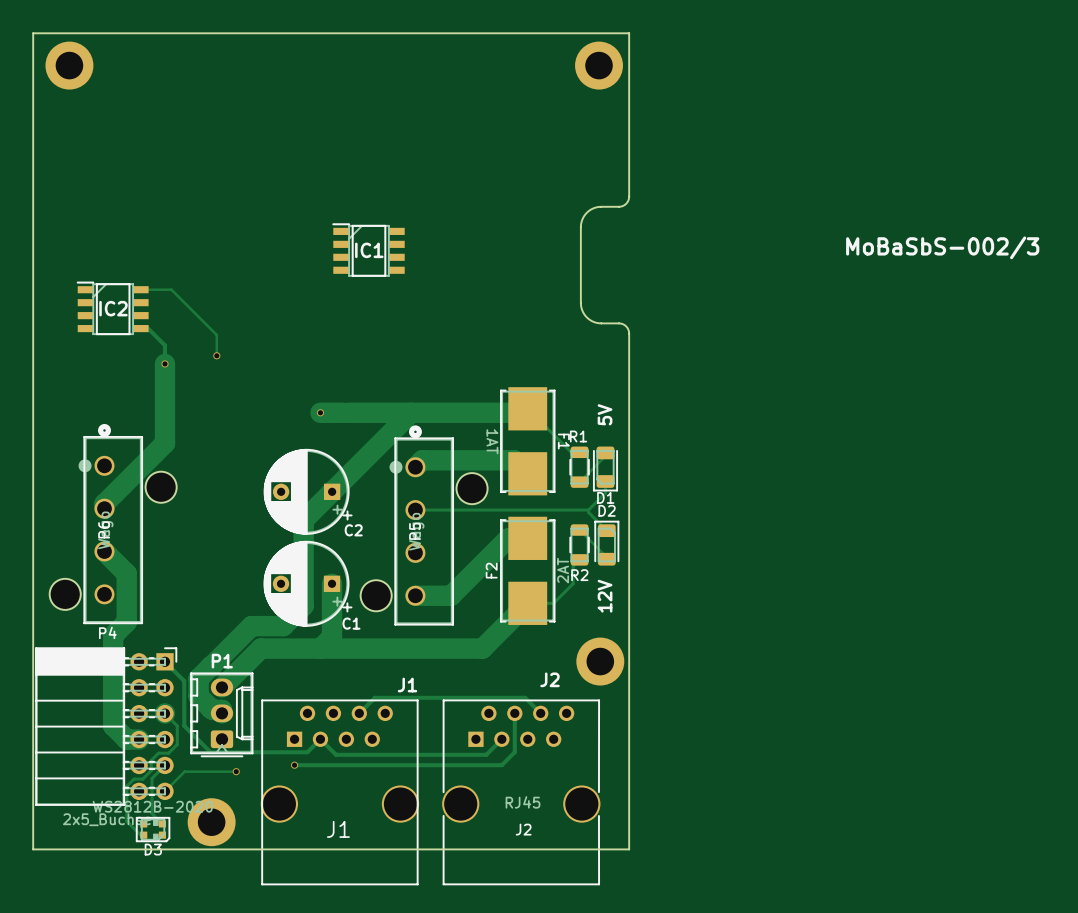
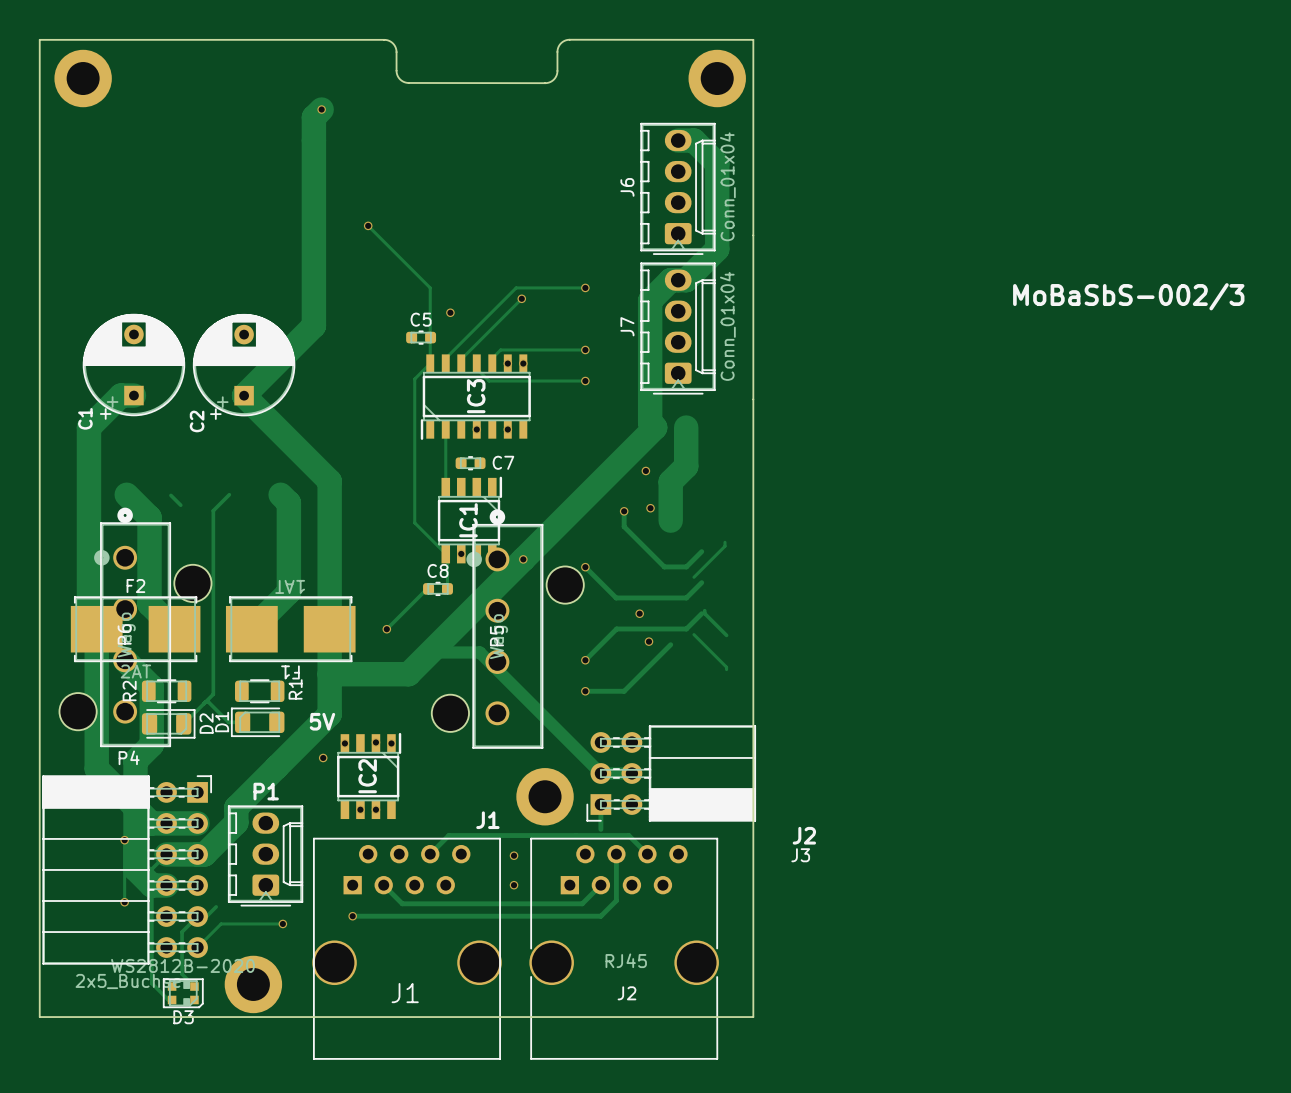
board edge: (320, 33) (629, 33) -> (384, 39) (390, 41) (395, 46) (397, 74) (401, 80) (406, 82) (545, 83) (551, 81) (556, 76) (558, 47) (561, 43) (566, 40) (753, 39)
via: none -> (321, 109)
track: none -> (678, 140) (693, 140) (717, 163) (717, 249) (686, 280) (670, 280) (650, 300) (650, 422) (655, 427) (408, 674) (329, 674)
J6: none -> Conn_01x04 (677, 188)
track: none -> (368, 225) (430, 287) (430, 363) (414, 379) (414, 522) (447, 555) (447, 588)
via: none -> (368, 225)
board edge: (629, 196) (626, 202) (622, 206) (599, 206) (590, 209) (584, 216) (580, 227) (580, 302) (582, 311) (588, 318) (594, 322) (623, 324) (627, 328) (629, 333) -> (753, 235) (753, 399)
track: none -> (585, 287) (516, 287) (445, 358) (445, 363)
via: none -> (585, 287)
track: none -> (521, 298) (461, 359) (461, 363)
via: none -> (521, 298)
IC1 rotation: 0° (368, 250) -> 90° clockwise (469, 520)
IC1 position: (368, 250) -> (469, 520)
via: none -> (450, 312)
J7: none -> Conn_01x04 (677, 328)
C5: none -> (421, 337)
track: (140, 289) (171, 289) (216, 335) (216, 355) -> none
track: none -> (585, 349) (500, 349) (492, 358) (492, 363)
via: none -> (585, 349)
track: none -> (476, 363) (476, 368) (489, 381) (585, 381)
via: none -> (507, 363)
via: none -> (523, 363)
IC2 rotation: 0° (112, 308) -> 90° clockwise (369, 775)
IC2 position: (112, 308) -> (369, 775)
via: none -> (585, 381)
track: (140, 328) (148, 328) (164, 345) (164, 443) (104, 503) (104, 508) -> none
track: none -> (133, 395) (120, 395) (88, 427) (88, 621) (96, 629) (96, 768) (151, 823) (197, 823)
IC3: none -> (475, 397)
via: (216, 355) -> none
track: none -> (686, 427) (686, 466) (670, 481) (670, 520)
track: none -> (445, 429) (445, 487)
via: none -> (476, 429)
via: none -> (507, 429)
via: (164, 363) -> none
C7: none -> (470, 463)
via: none -> (645, 470)
track: (320, 412) (342, 412) -> none
via: (320, 412) -> none
track: (348, 412) (523, 412) (527, 408) (571, 452) (579, 452) -> none
track: (411, 412) (303, 520) (303, 605) (283, 626) (251, 626) (198, 678) (198, 696) (212, 709) (222, 709) (222, 713) -> none
track: none -> (126, 494) (149, 517) (149, 604) (174, 629)
track: none -> (170, 495) (180, 505)
track: none -> (229, 494) (213, 510) (213, 694) (183, 723)
track: none -> (280, 494) (288, 502) (288, 592) (251, 629) (246, 623)
text: 5V (605, 414) -> none
via: none -> (650, 508)
track: none -> (624, 511) (624, 526) (664, 566) (686, 566) (701, 551)
via: none -> (624, 511)
F1 rotation: 0° (527, 441) -> 90° clockwise (290, 629)
F1 position: (527, 441) -> (290, 629)
via: none -> (461, 553)
track: (415, 467) (422, 460) (514, 460) (527, 473) -> none
via: none -> (523, 559)
R1 rotation: 0° (579, 467) -> 90° clockwise (259, 691)
R1 position: (579, 467) -> (259, 691)
D1 rotation: 0° (605, 468) -> 90° clockwise (257, 722)
D1 position: (605, 468) -> (257, 722)
track: none -> (585, 567) (616, 597) (686, 597) (701, 582)
via: none -> (585, 567)
track: (605, 481) (605, 493) (588, 510) (415, 510) -> none
C2 rotation: 0° (308, 491) -> 90° clockwise (244, 366)
C2 position: (308, 491) -> (244, 366)
track: none -> (430, 588) (427, 588) (386, 629)
C8: none -> (438, 588)
via: none -> (639, 613)
track: none -> (701, 613) (686, 628) (616, 628) (585, 660)
via: none -> (386, 629)
via: none -> (648, 641)
track: (527, 538) (508, 538) (451, 595) (415, 595) -> none
track: none -> (670, 644) (624, 691) (585, 691)
D2 rotation: 0° (606, 543) -> 90° clockwise (168, 723)
D2 position: (606, 543) -> (168, 723)
track: none -> (430, 652) (479, 652) (600, 773) (631, 773)
R2 rotation: 0° (579, 544) -> 90° clockwise (166, 691)
R2 position: (579, 544) -> (166, 691)
via: none -> (585, 660)
track: (579, 559) (573, 566) (573, 583) (553, 603) (527, 603) (482, 648) (260, 648) (222, 687) -> none
F2 rotation: 0° (527, 570) -> 90° clockwise (135, 629)
F2 position: (527, 570) -> (135, 629)
via: none -> (585, 691)
C1 rotation: 0° (307, 583) -> 90° clockwise (133, 366)
C1 position: (307, 583) -> (133, 366)
track: (332, 583) (332, 637) (320, 648) -> none
track: none -> (205, 702) (208, 702) (228, 722) (242, 722)
text: 12V (605, 596) -> none
text: none -> 5V (322, 721)
via: none -> (344, 743)
via: none -> (375, 742)
via: none -> (391, 743)
via: none -> (323, 757)
J3: none -> (671, 773)
track: (164, 661) (184, 681) (184, 725) (210, 752) (307, 752) (320, 739) -> none
part position: (600, 661) -> (545, 796)
track: none -> (600, 804) (600, 829)
via: none -> (360, 809)
via: none -> (375, 809)
text position: J2 (550, 679) -> J2 (804, 835)
track: none -> (124, 840) (124, 902)
via: none -> (124, 840)
track: (164, 713) (177, 725) (177, 744) (168, 753) (158, 753) (151, 760) (151, 770) (142, 779) (134, 779) (126, 786) -> (321, 109) (313, 117) (313, 325) (244, 395) (329, 481) (329, 714) (236, 807) (236, 822) (204, 854) (166, 854) (151, 869) (151, 941)
via: none -> (514, 855)
via: none -> (514, 885)
via: none -> (124, 902)
track: none -> (216, 906) (206, 916) (197, 916)

